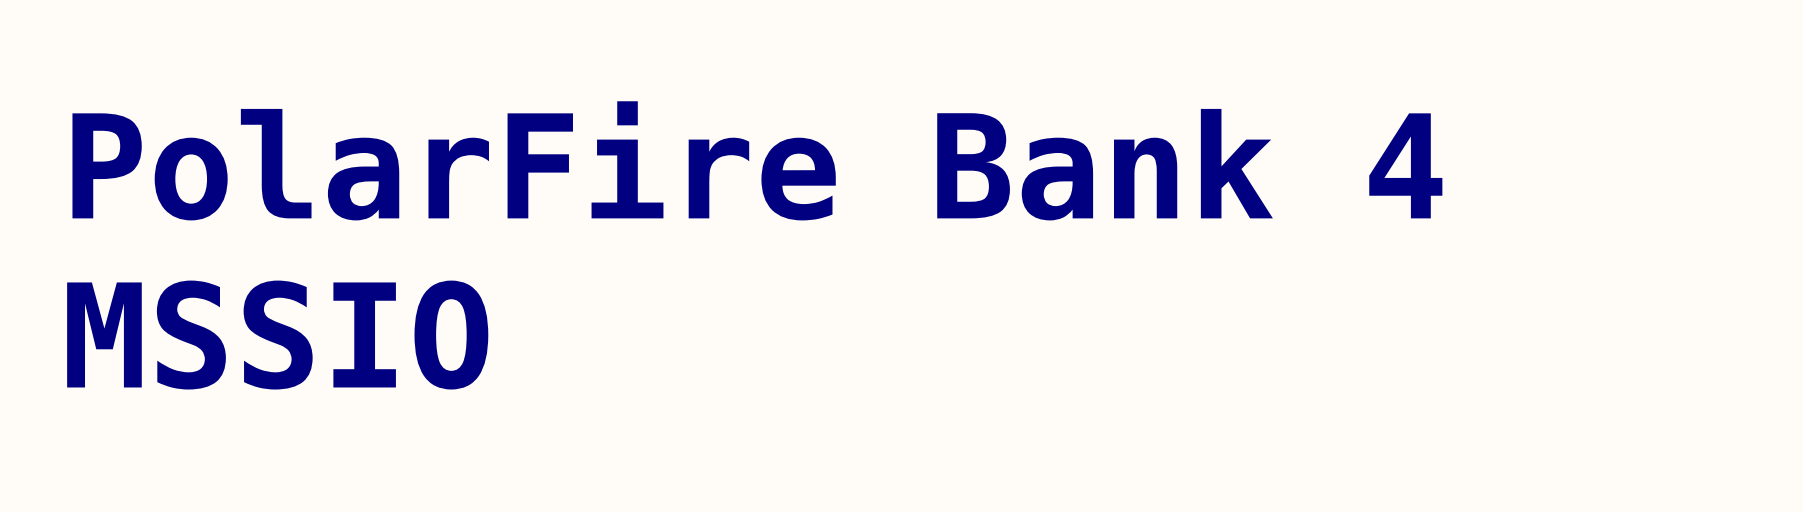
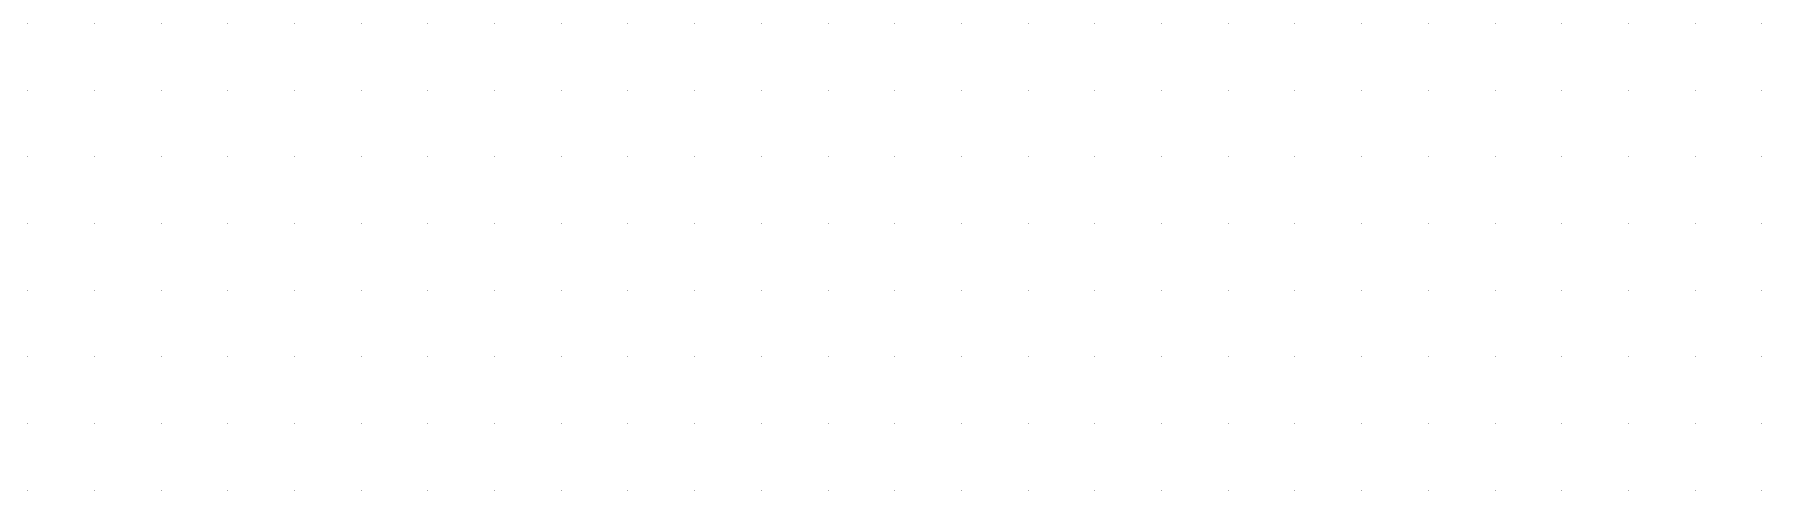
text: PolarFire Bank 4 (757, 160) -> none
text: MSSIO (277, 335) -> none

